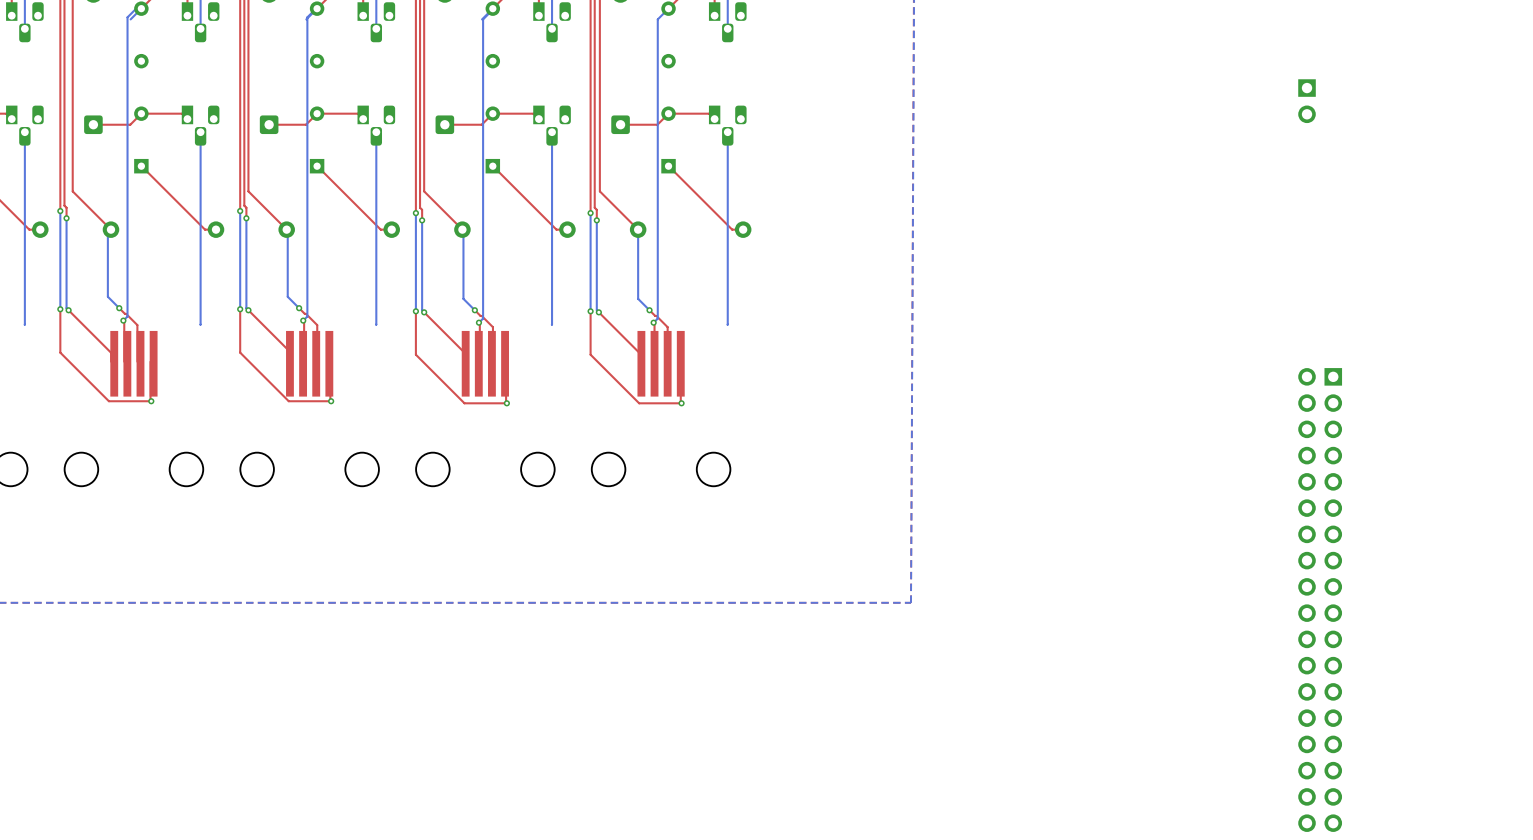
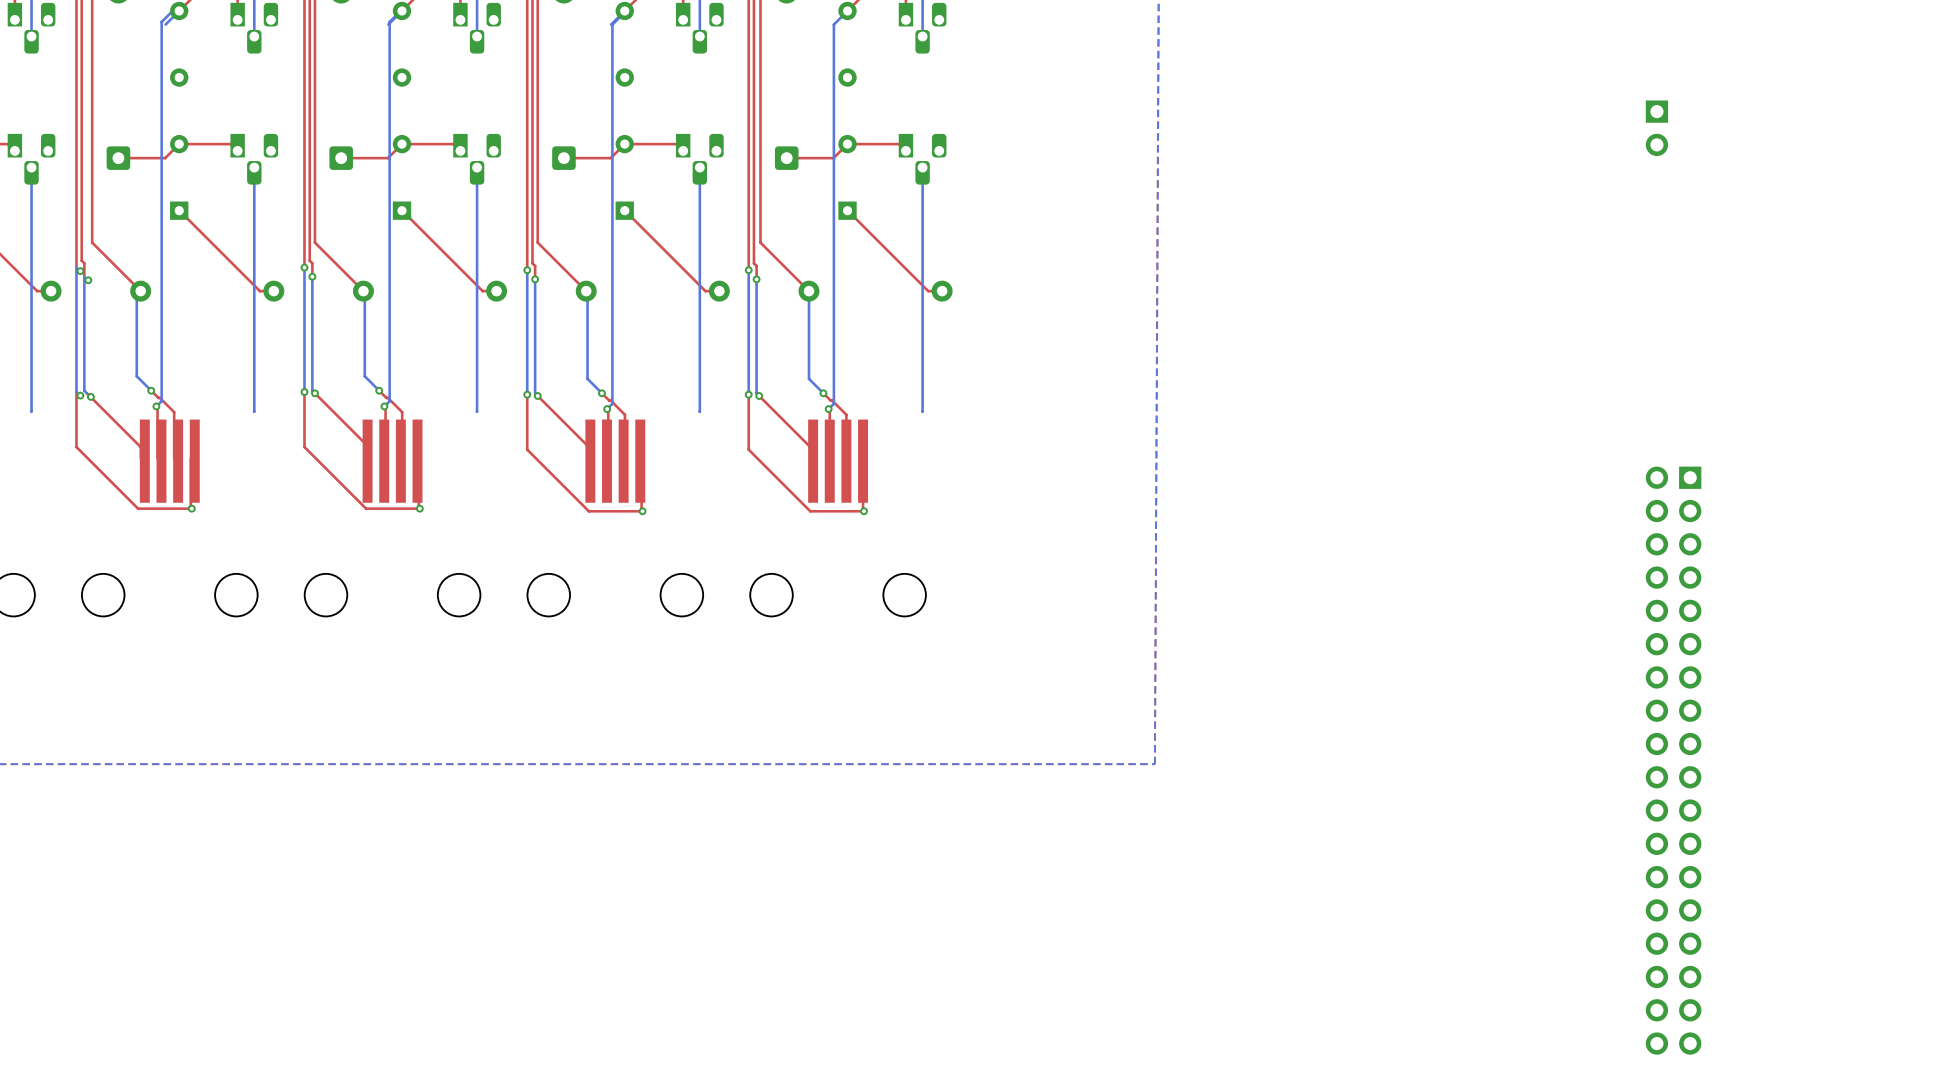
via: (60, 211) -> none
via: none -> (80, 271)
via: (66, 218) -> none
via: none -> (88, 280)
via: (60, 309) -> none
via: (68, 310) -> none
via: none -> (80, 395)
via: none -> (90, 396)

